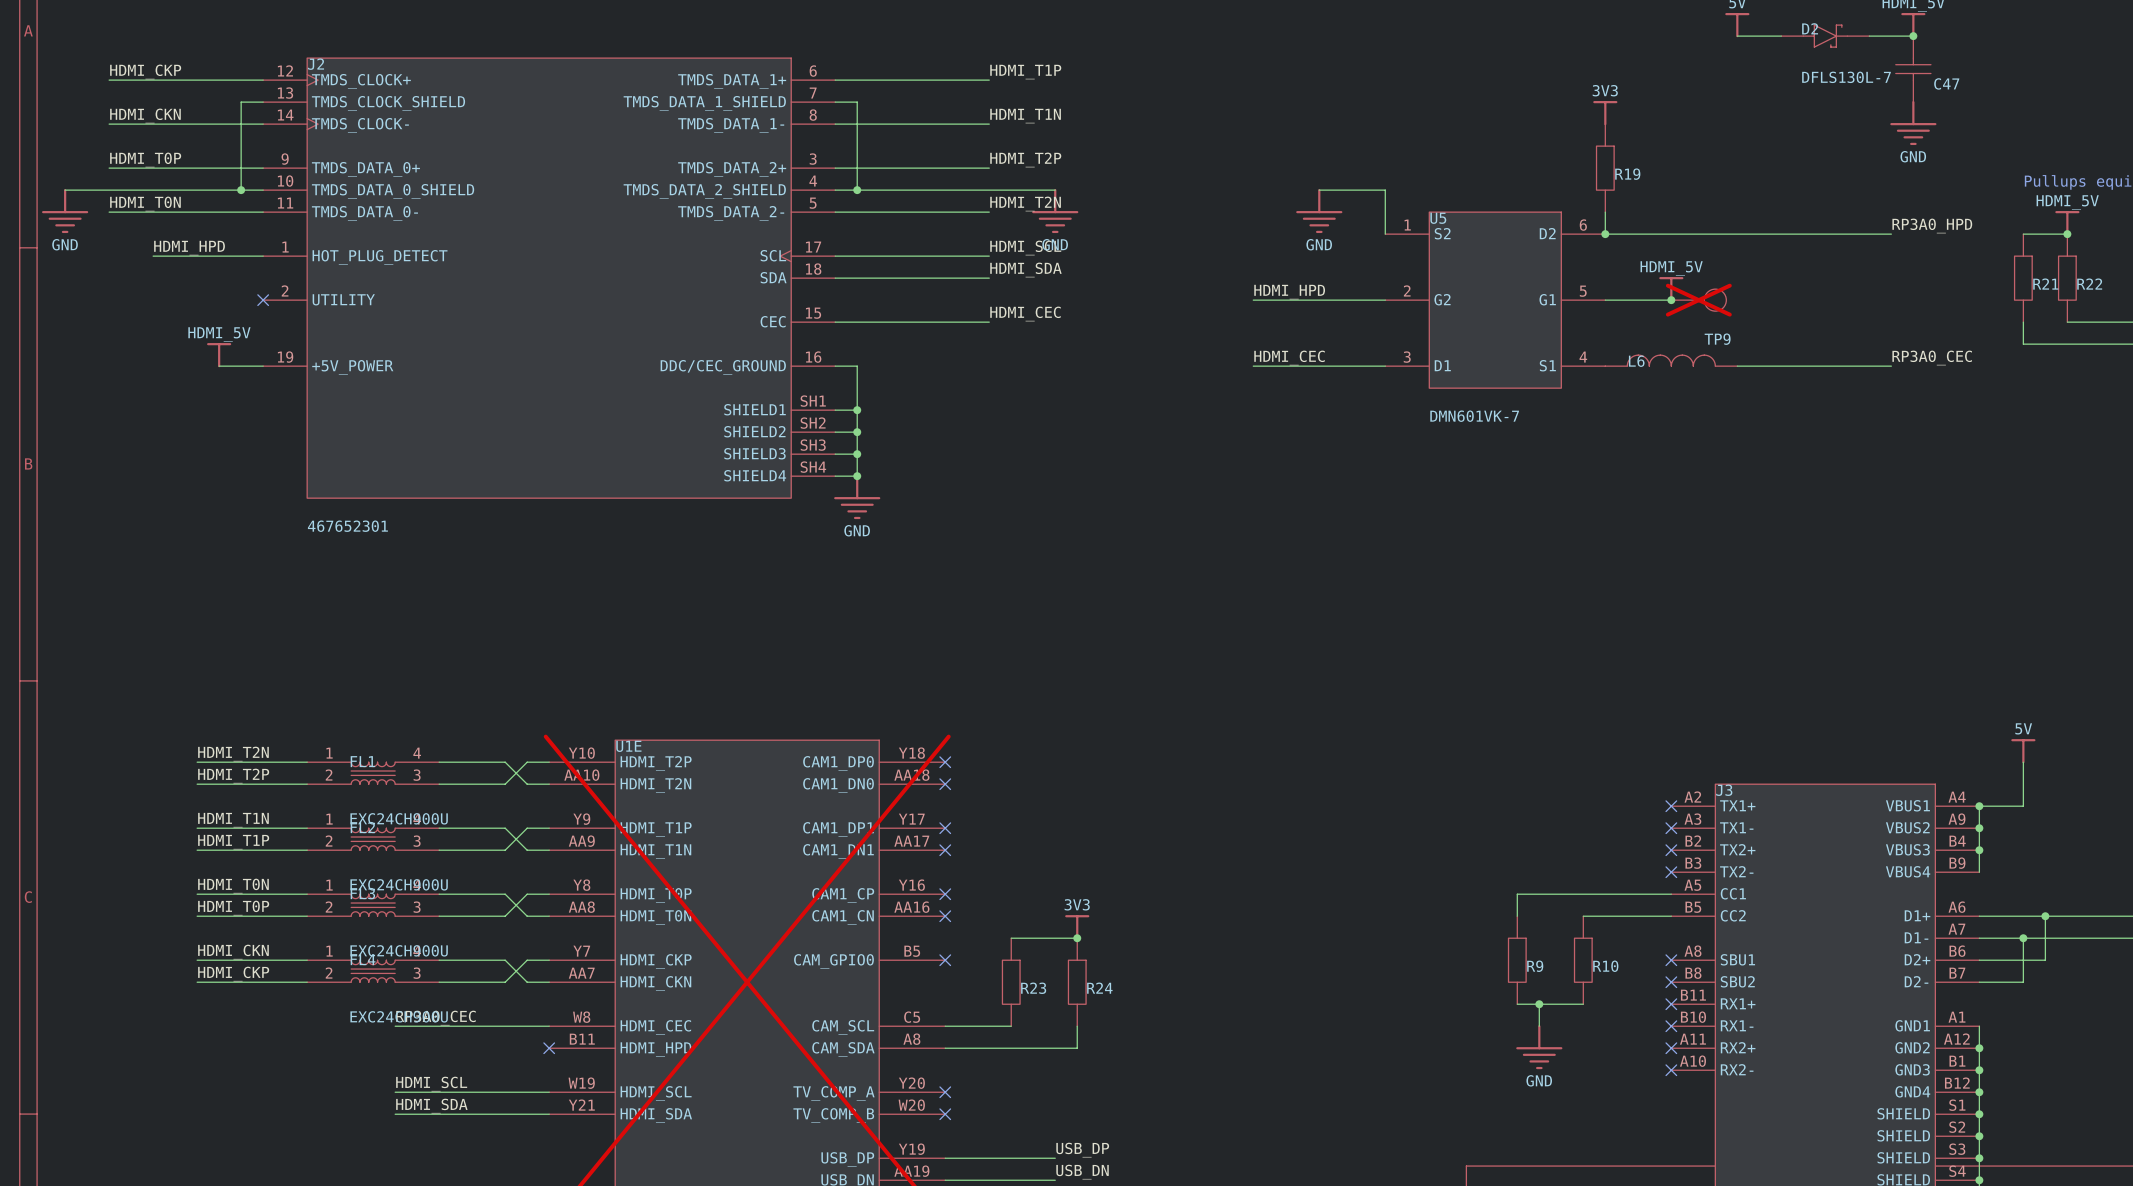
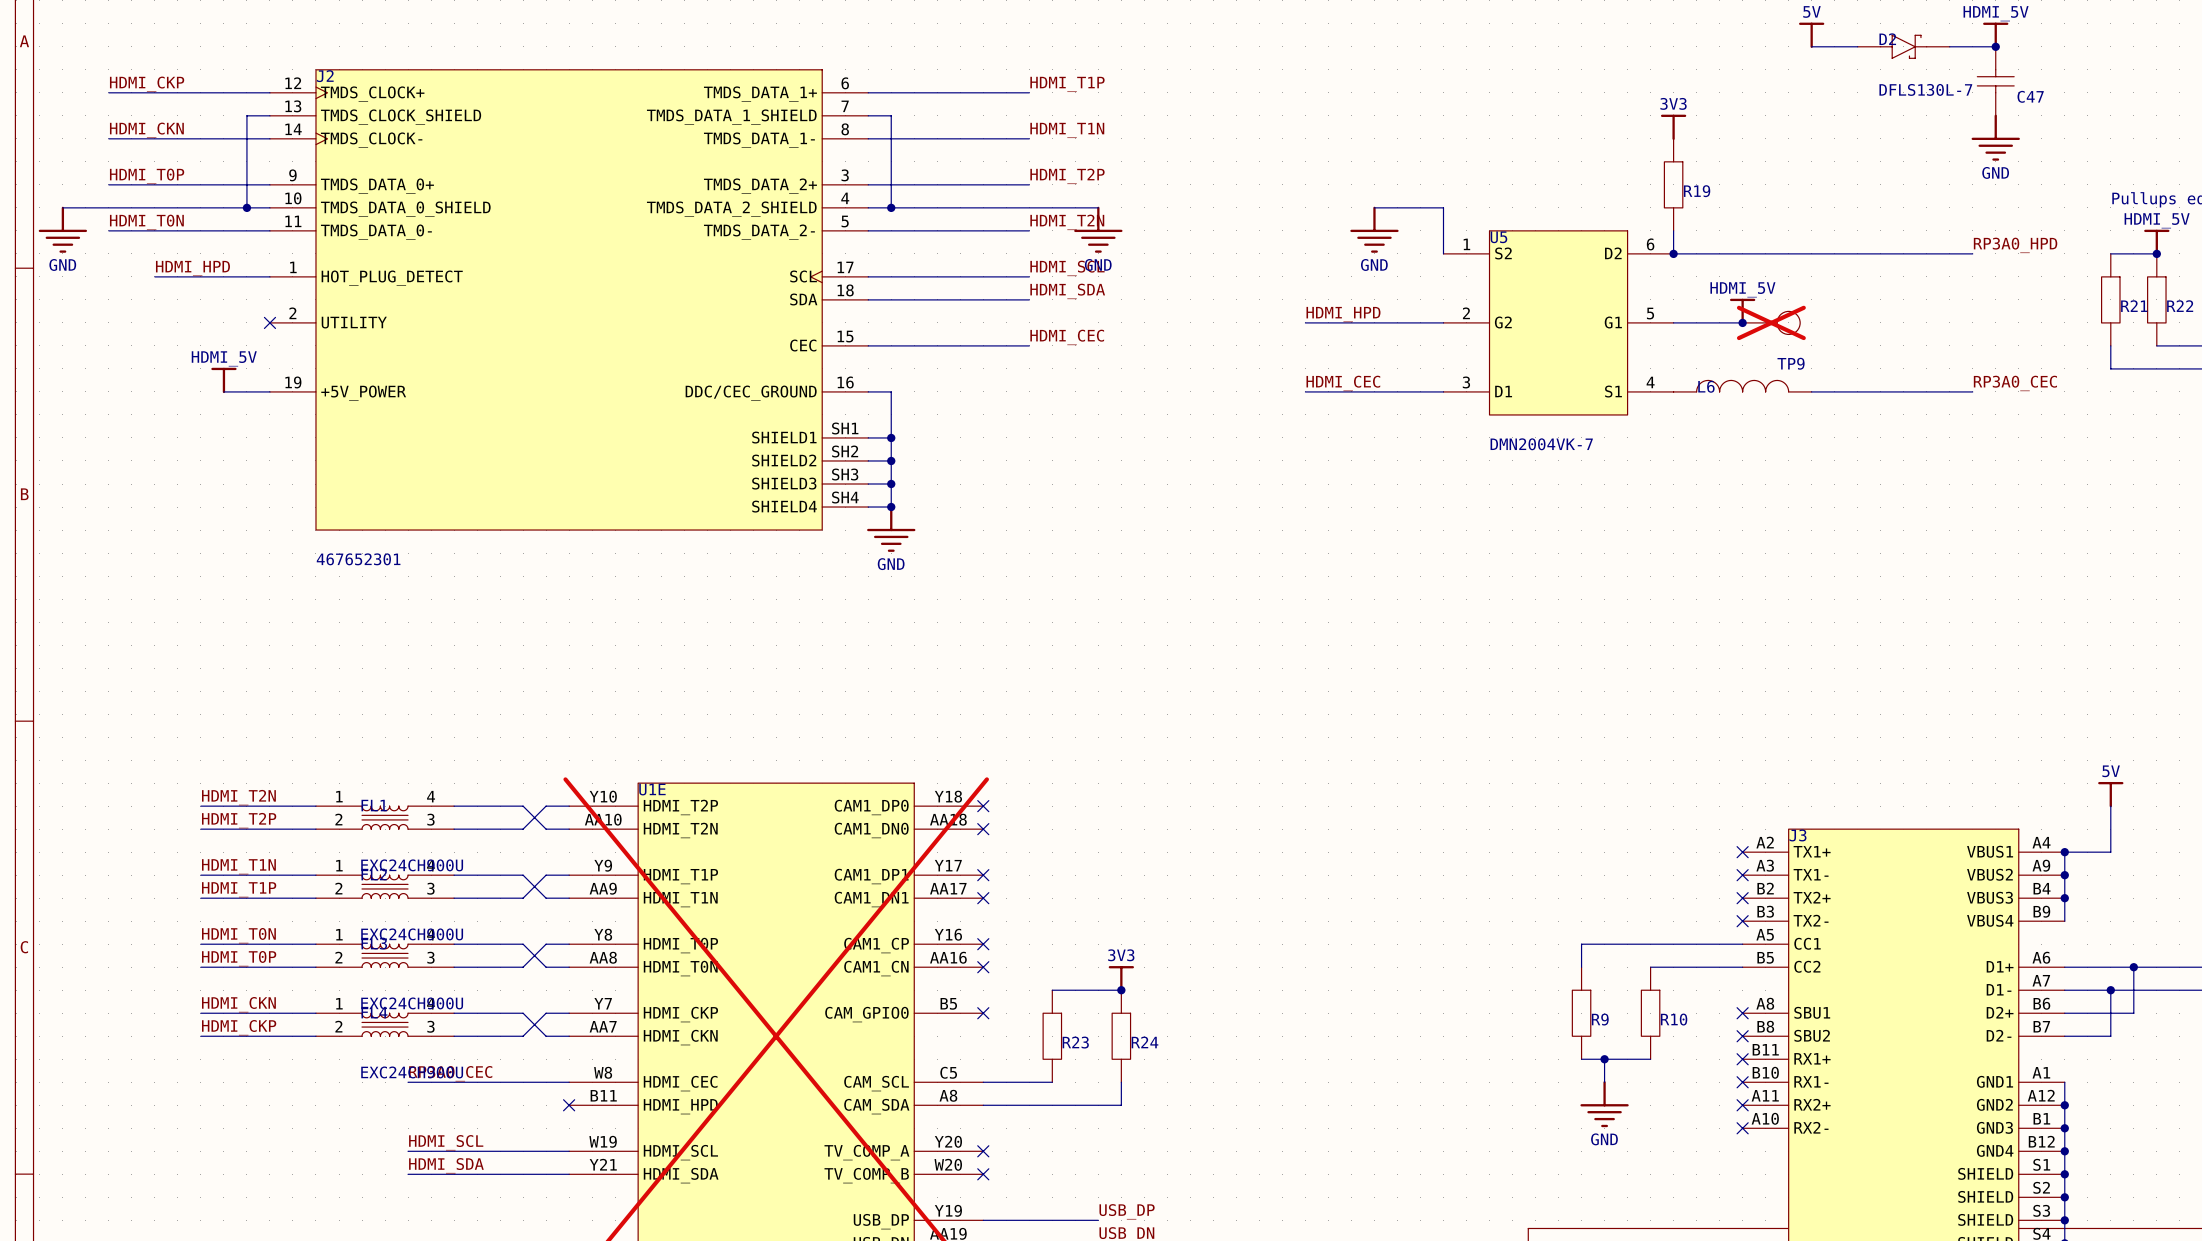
U5 value: DMN601VK-7 (1474, 416) -> DMN2004VK-7 (1541, 444)

